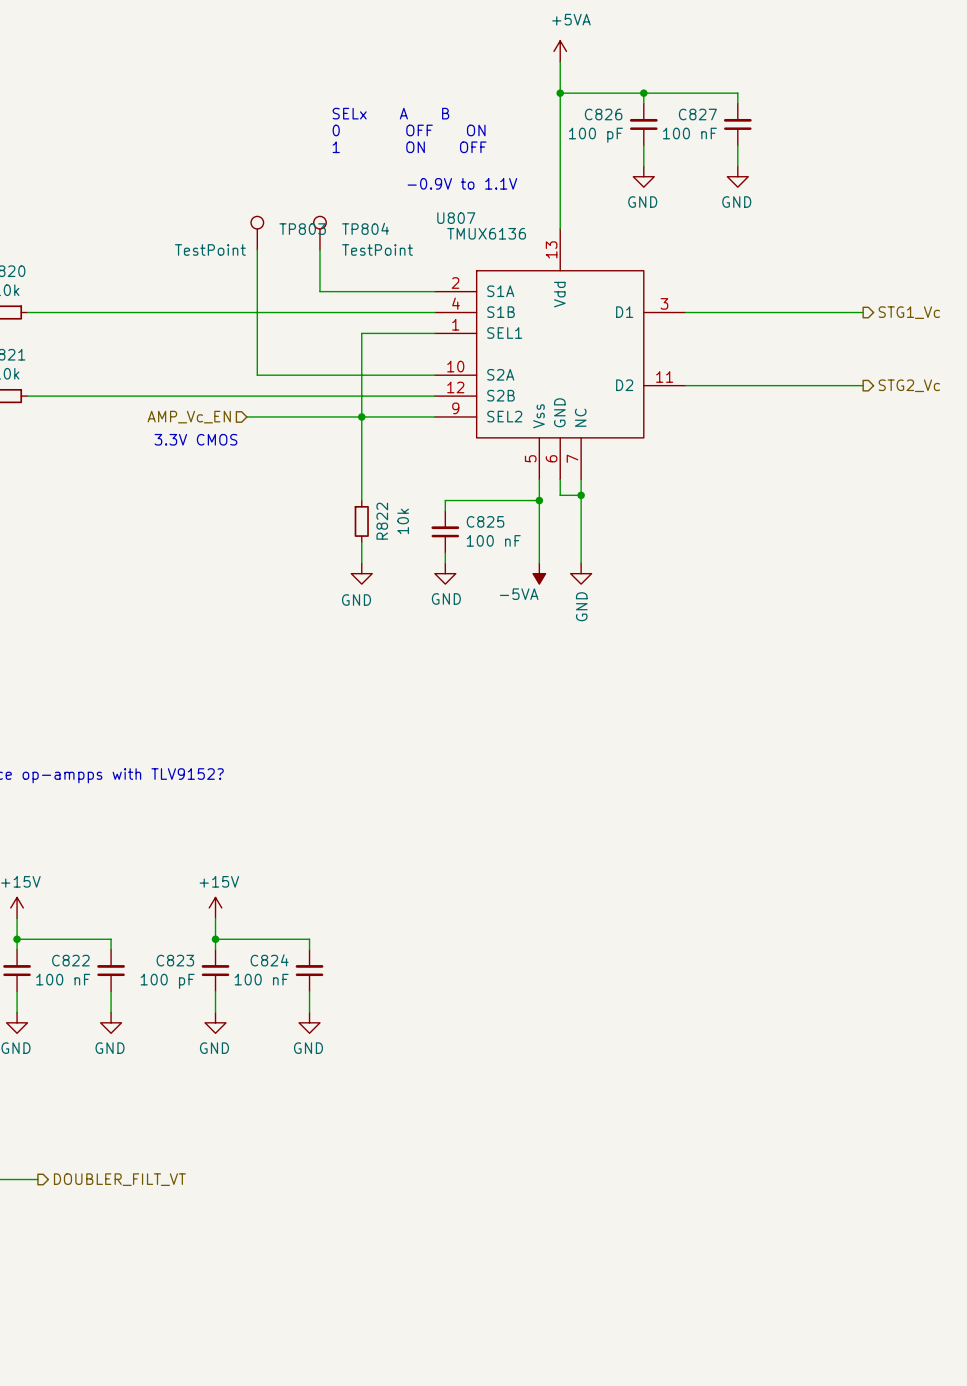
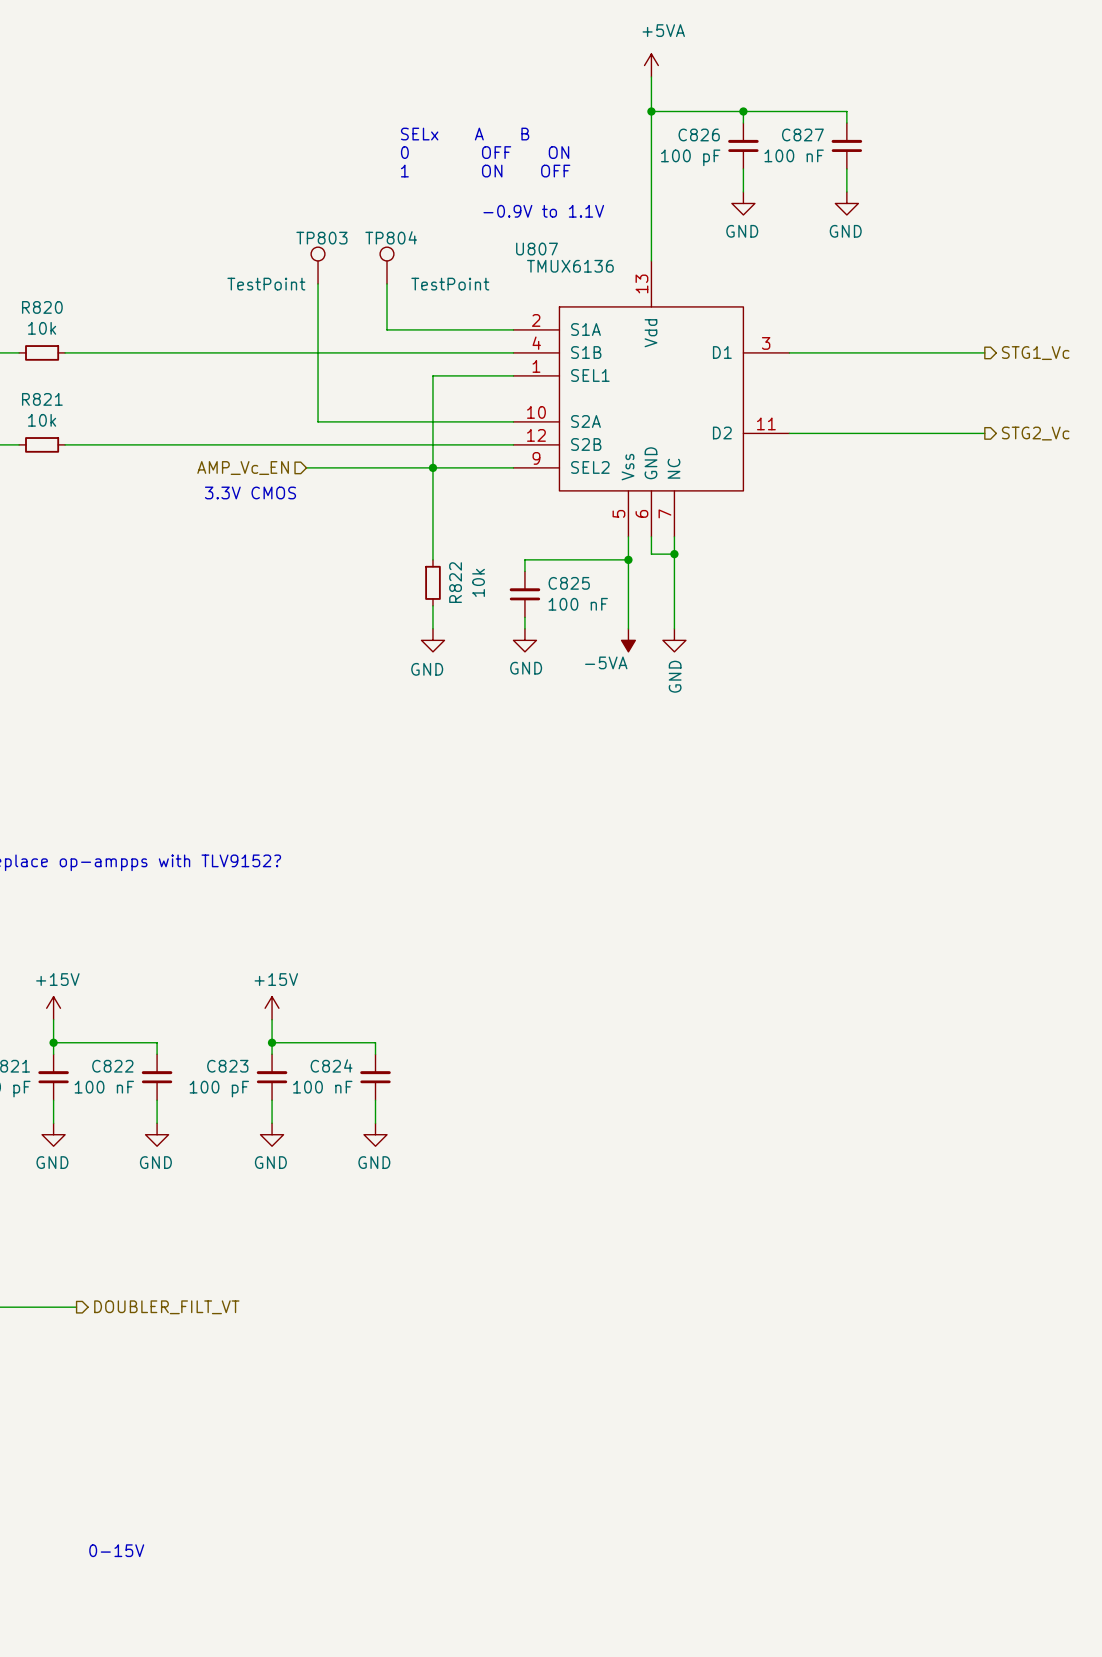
TP804 name position: TP804 (365, 228) -> TP804 (391, 237)
TP803 name position: TP803 (302, 229) -> TP803 (321, 238)

